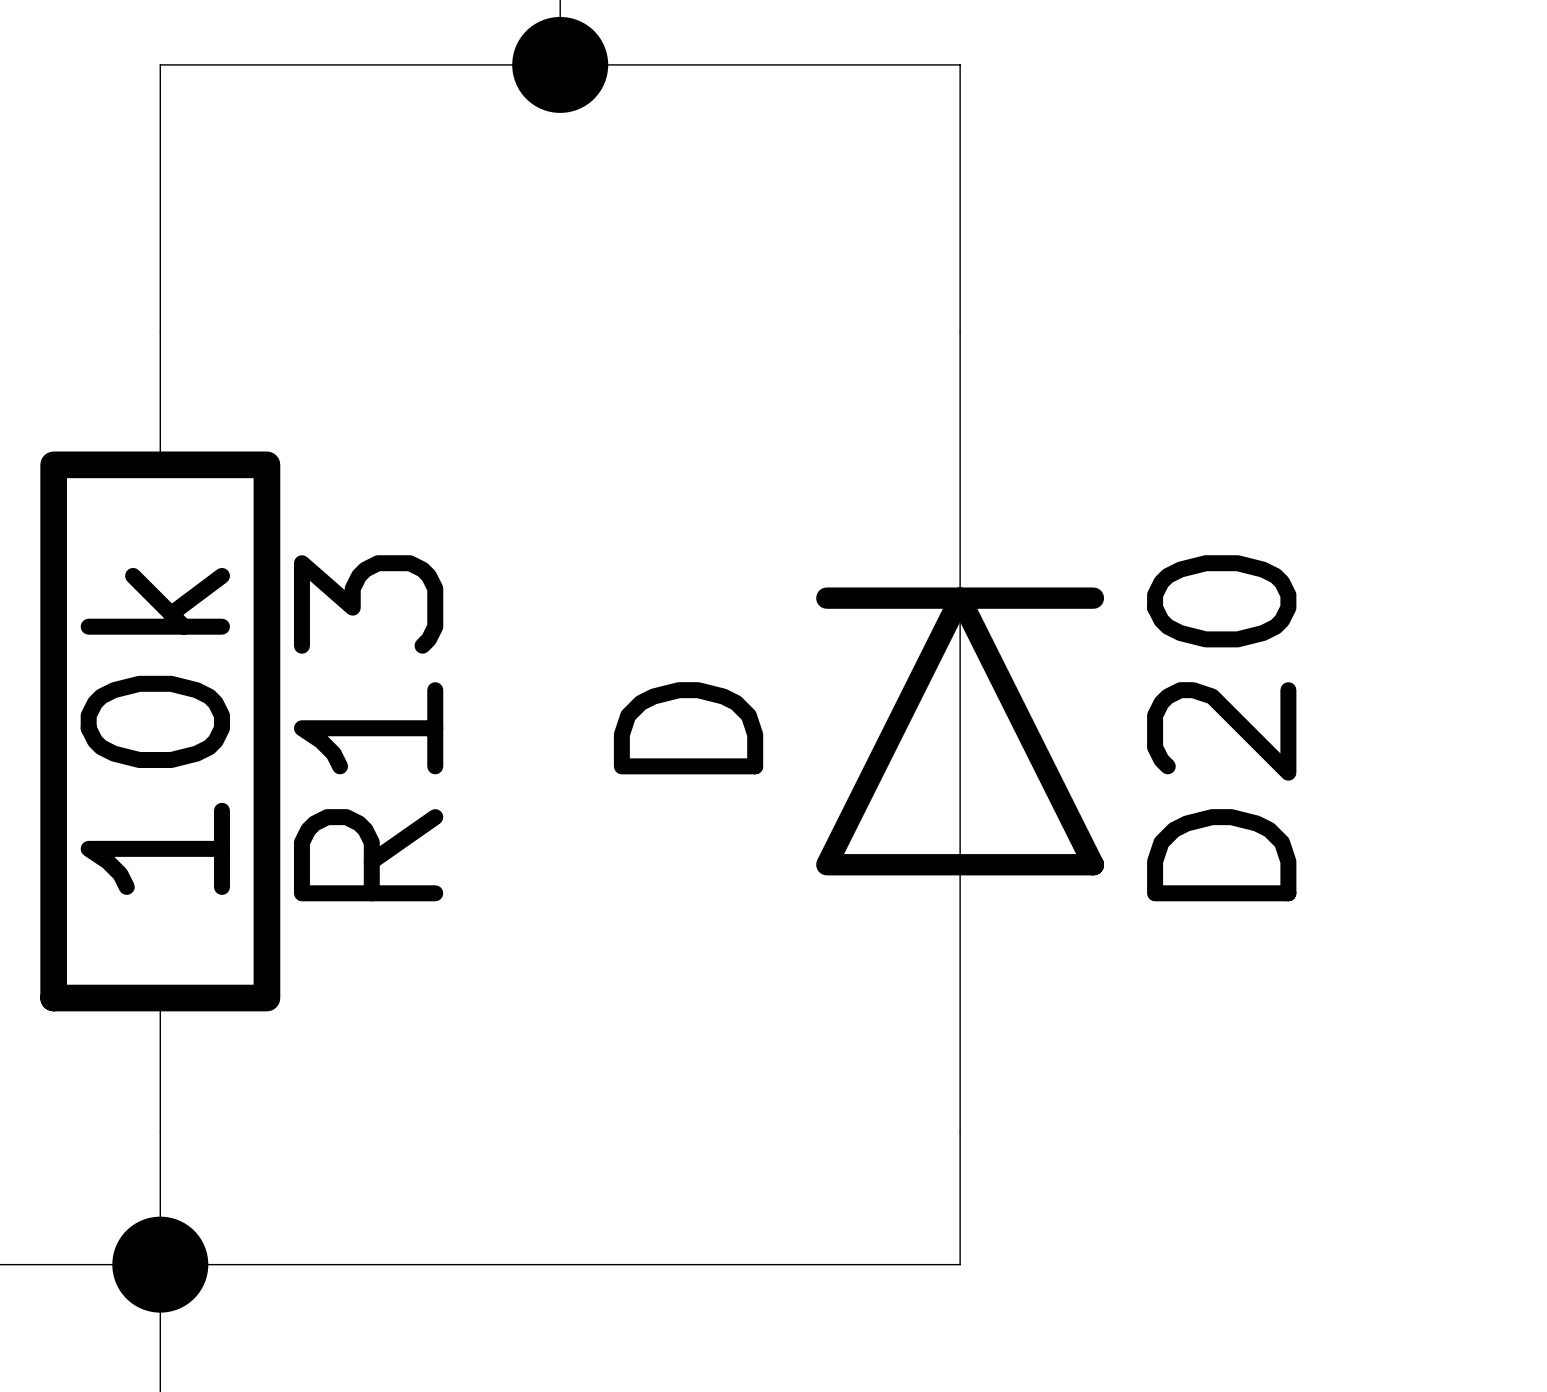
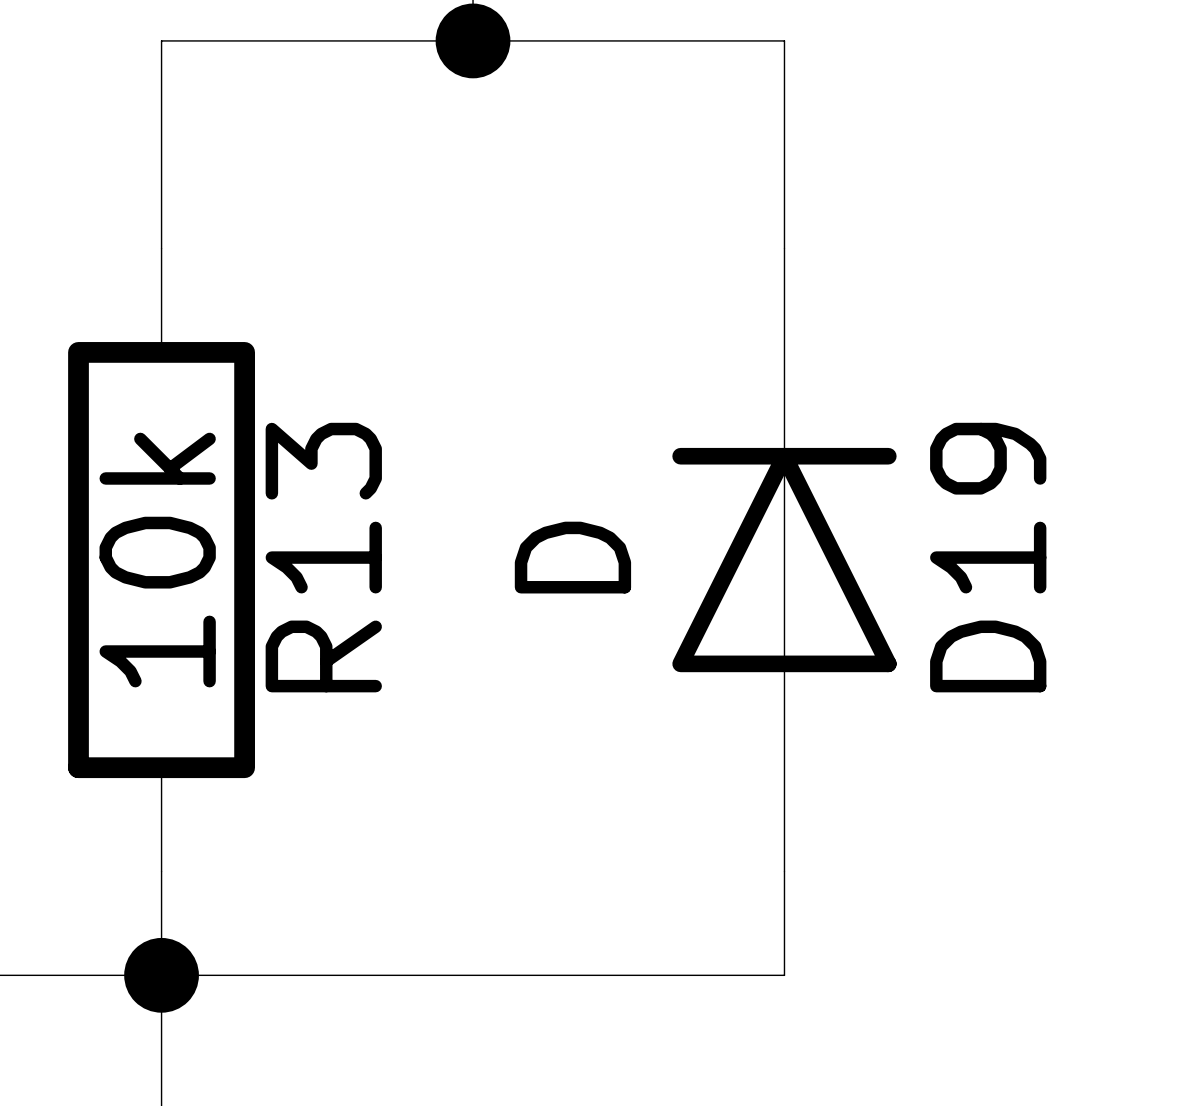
D20 name: D20 (1221, 728) -> D19 (988, 557)

